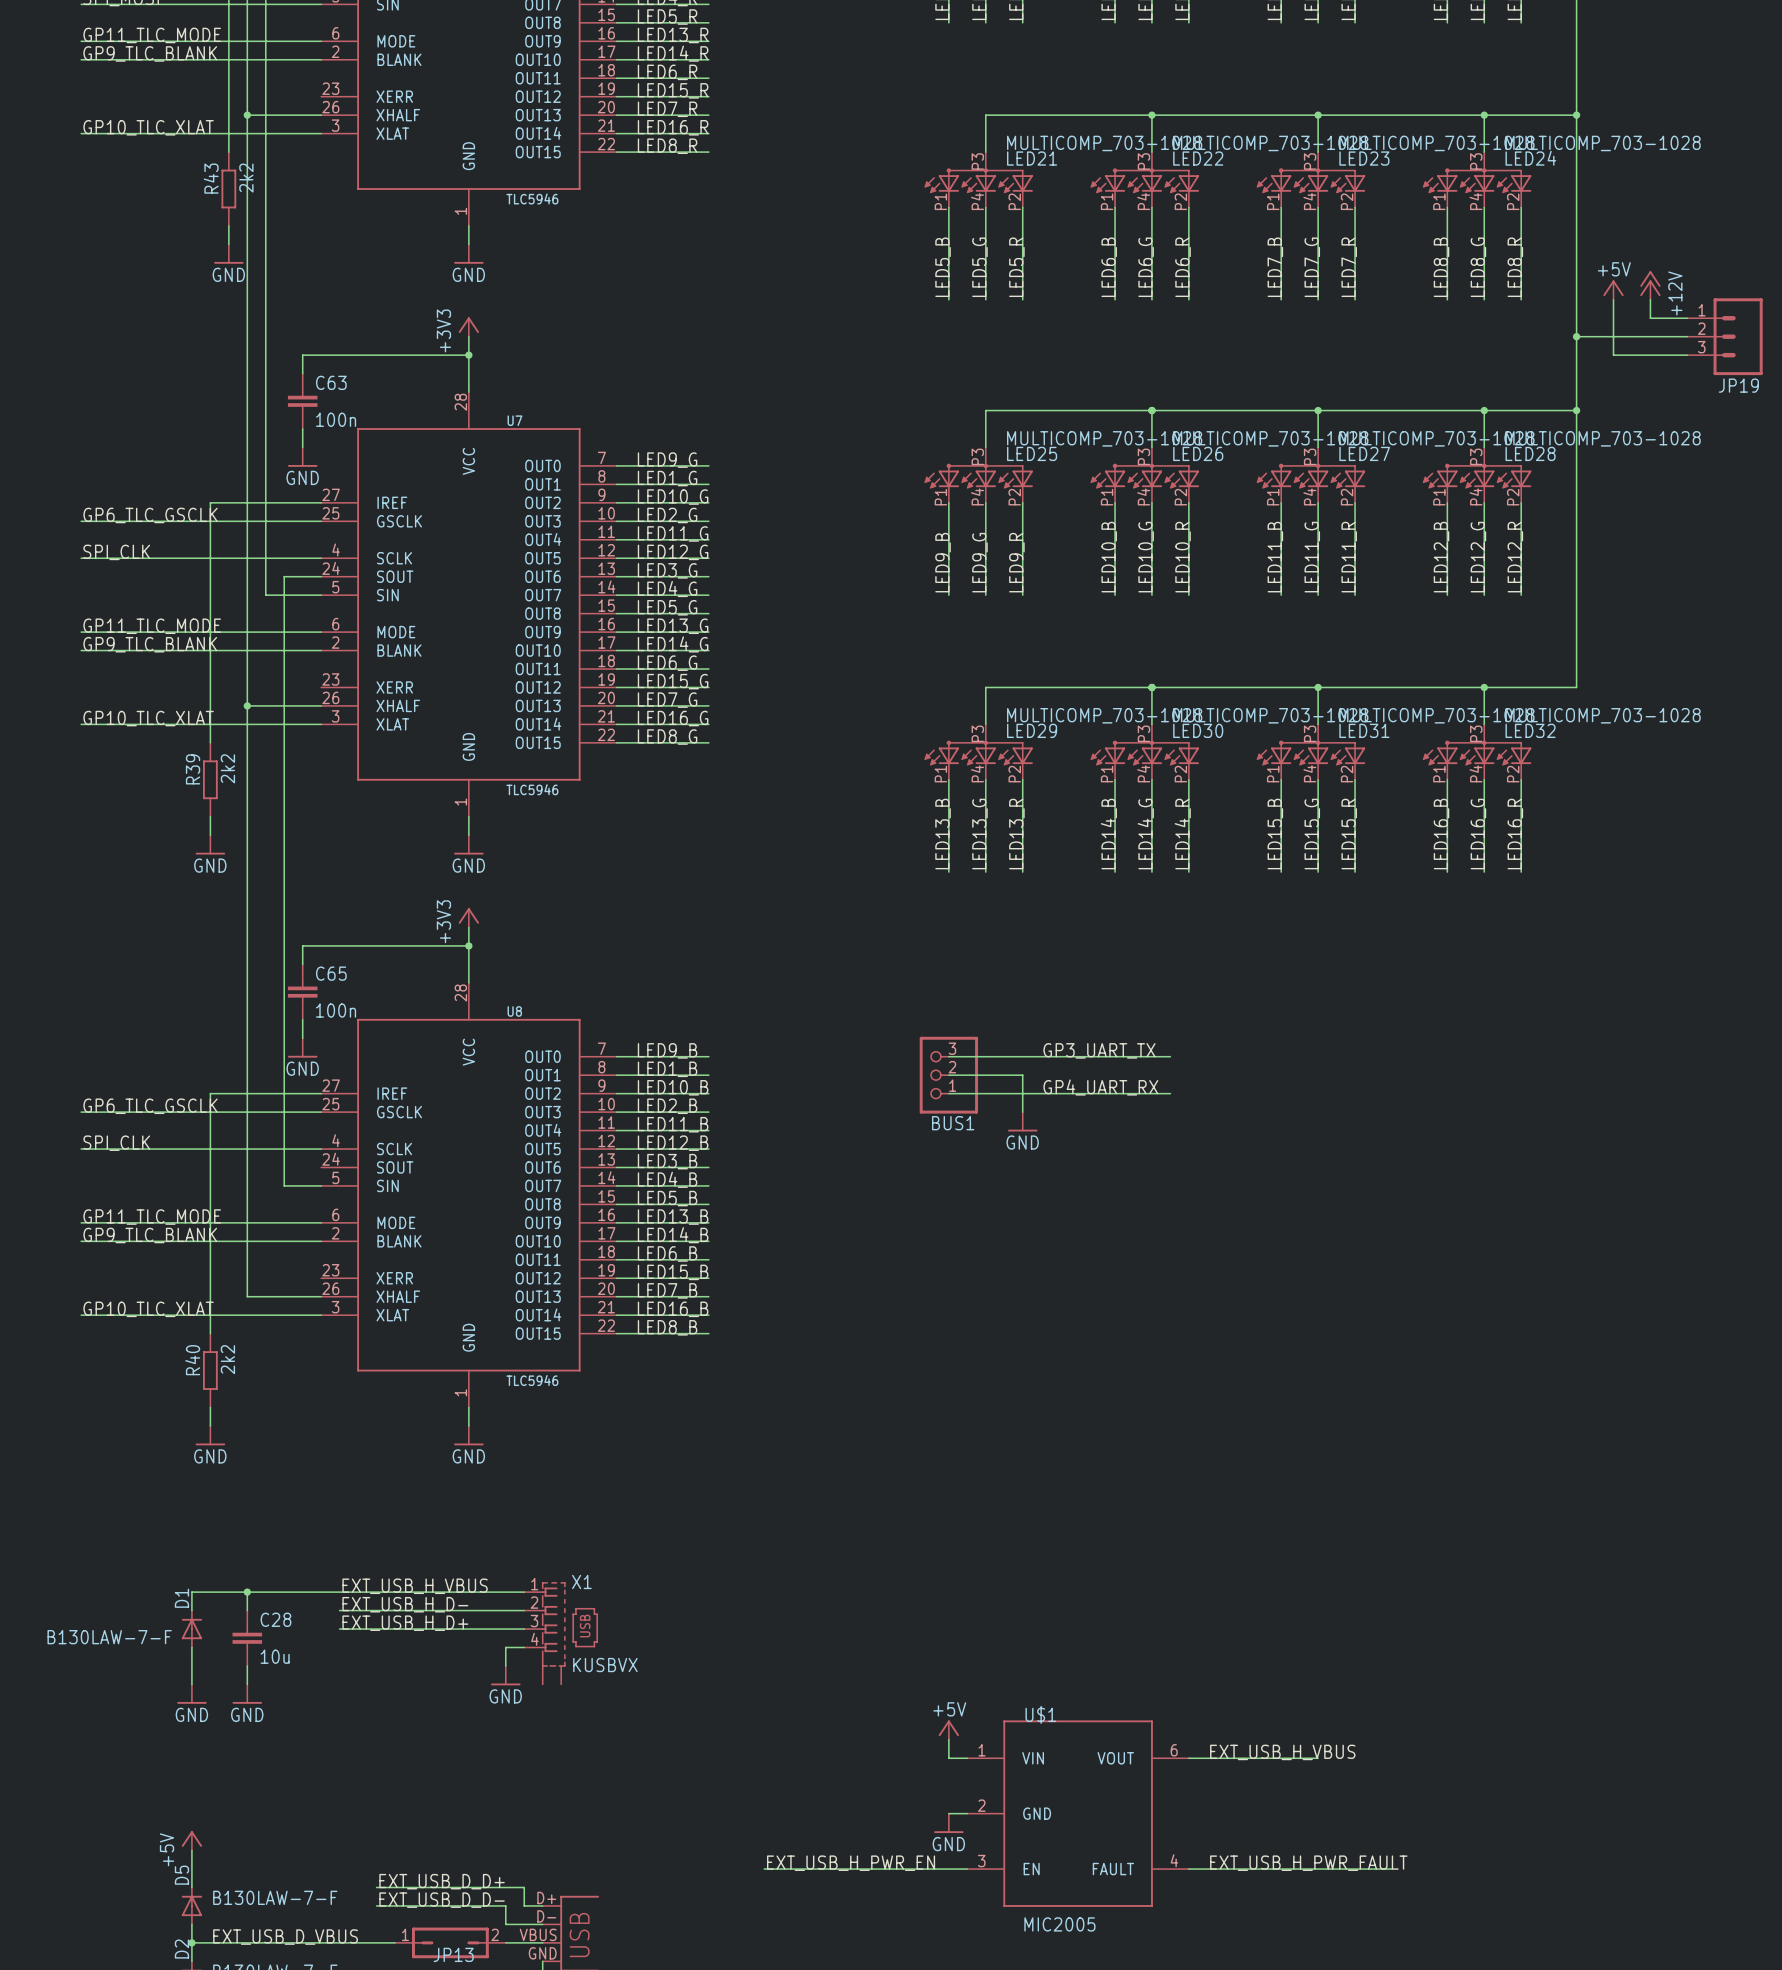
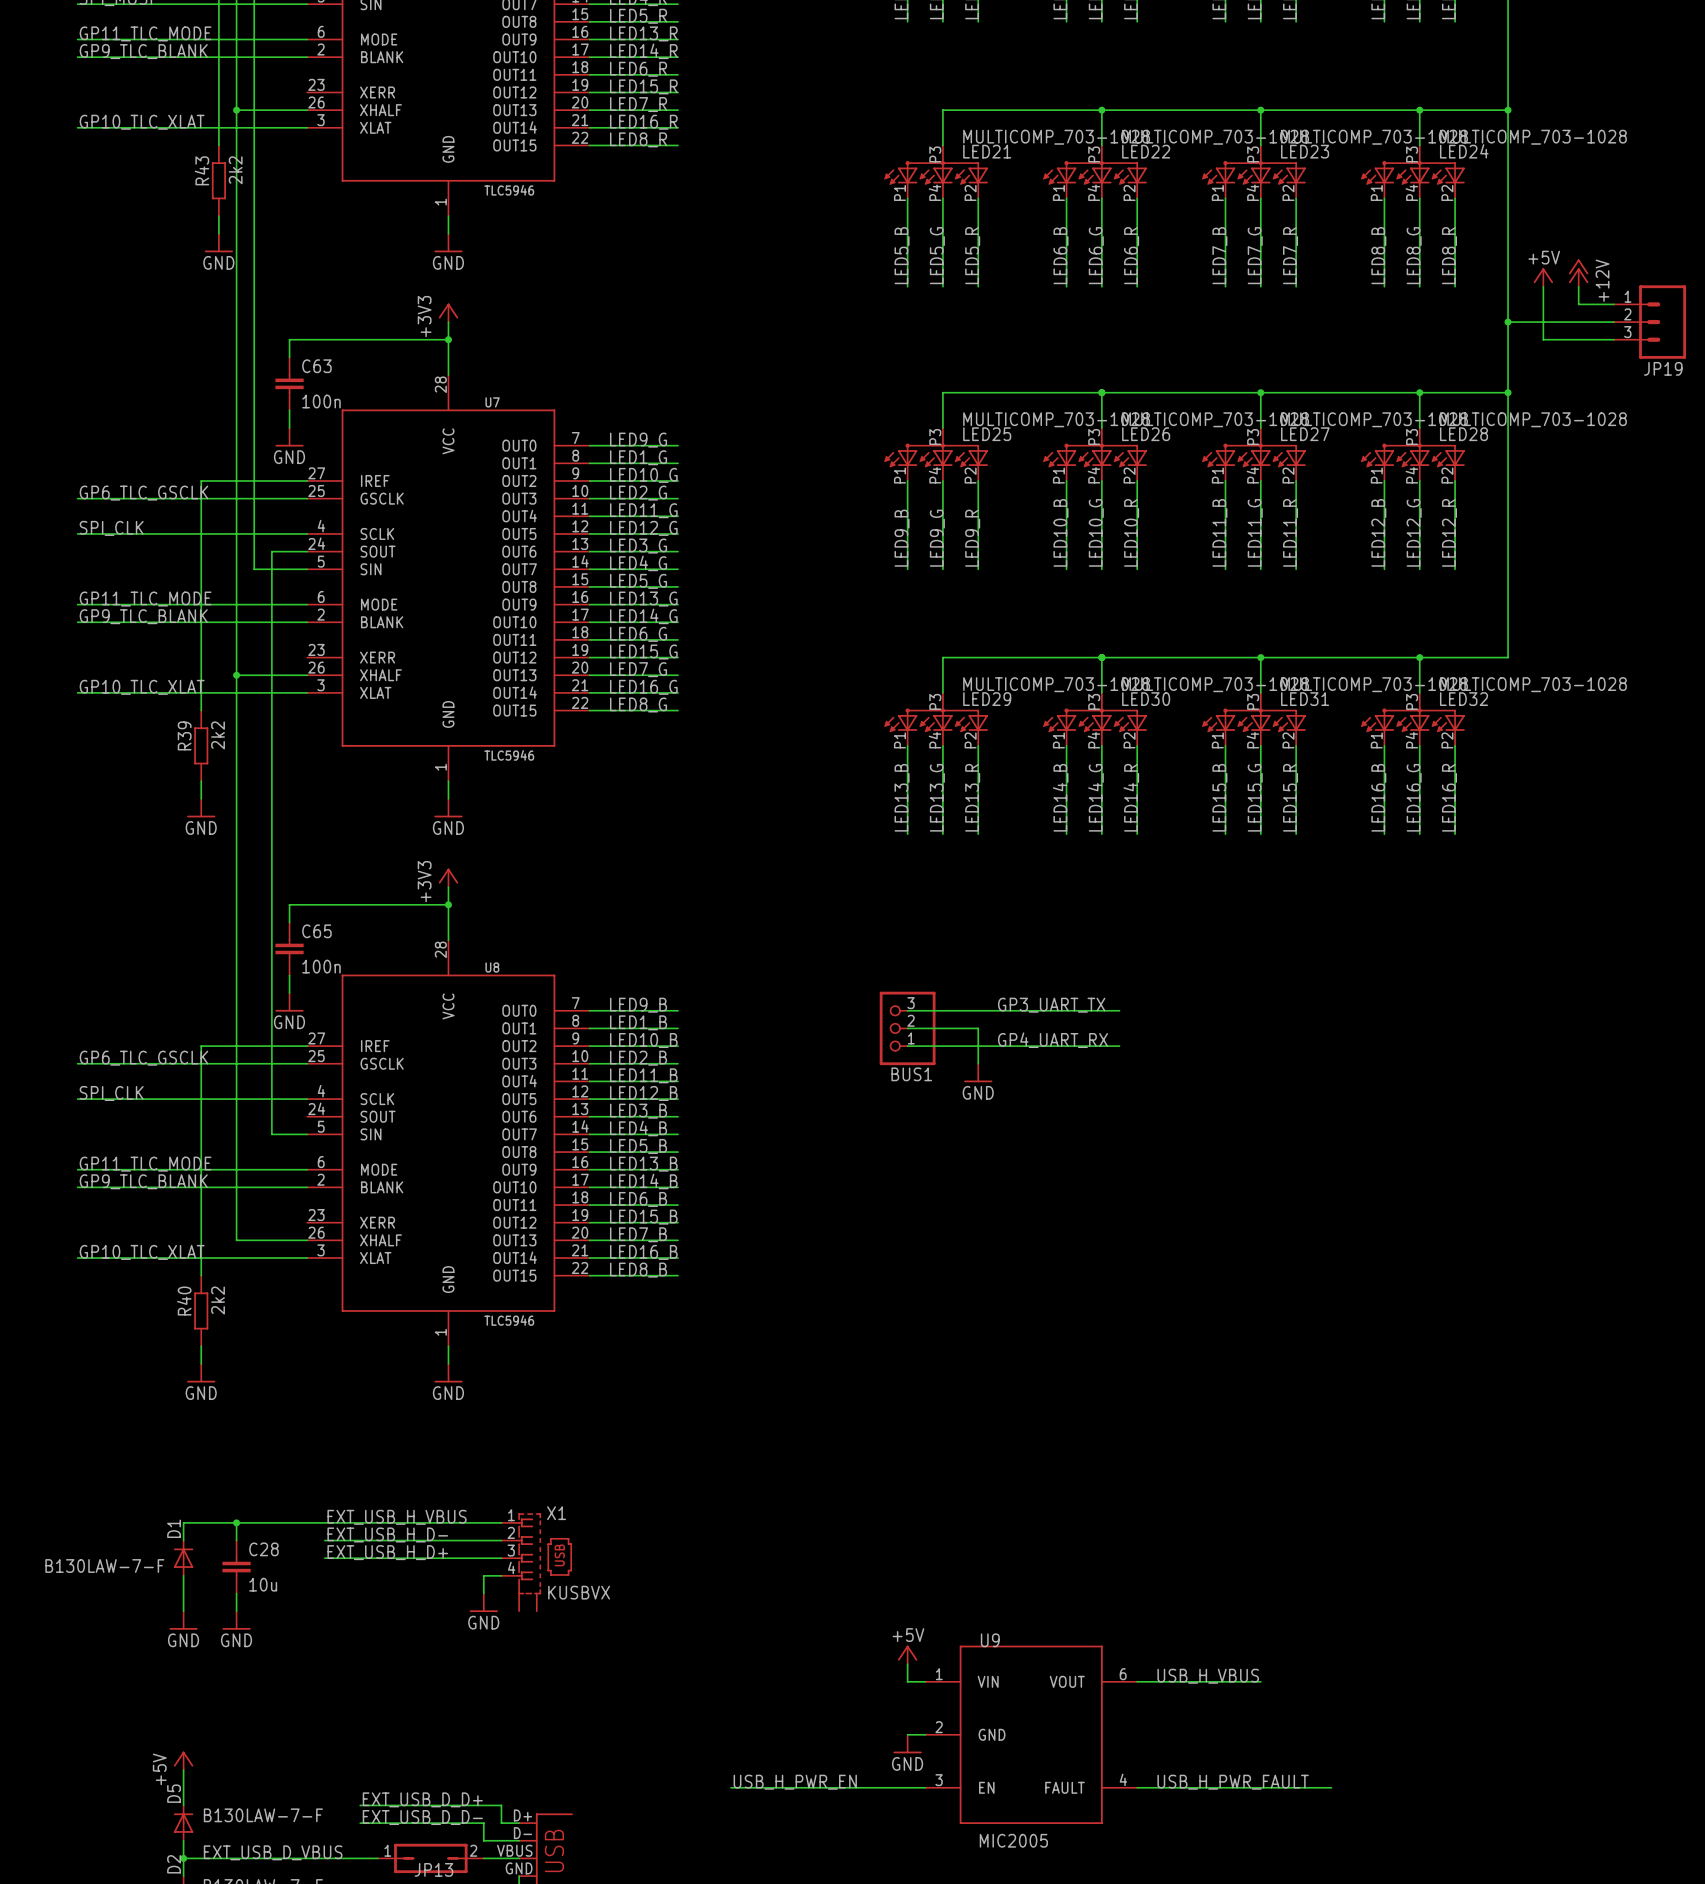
U$1 name: U$1 (1040, 1714) -> U9 (990, 1640)
label: EXT_USB_H_VBUS (1282, 1752) -> USB_H_VBUS (1208, 1676)
label: EXT_USB_H_PWR_EN (851, 1863) -> USB_H_PWR_EN (795, 1782)
label: EXT_USB_H_PWR_FAULT (1308, 1863) -> USB_H_PWR_FAULT (1233, 1782)

